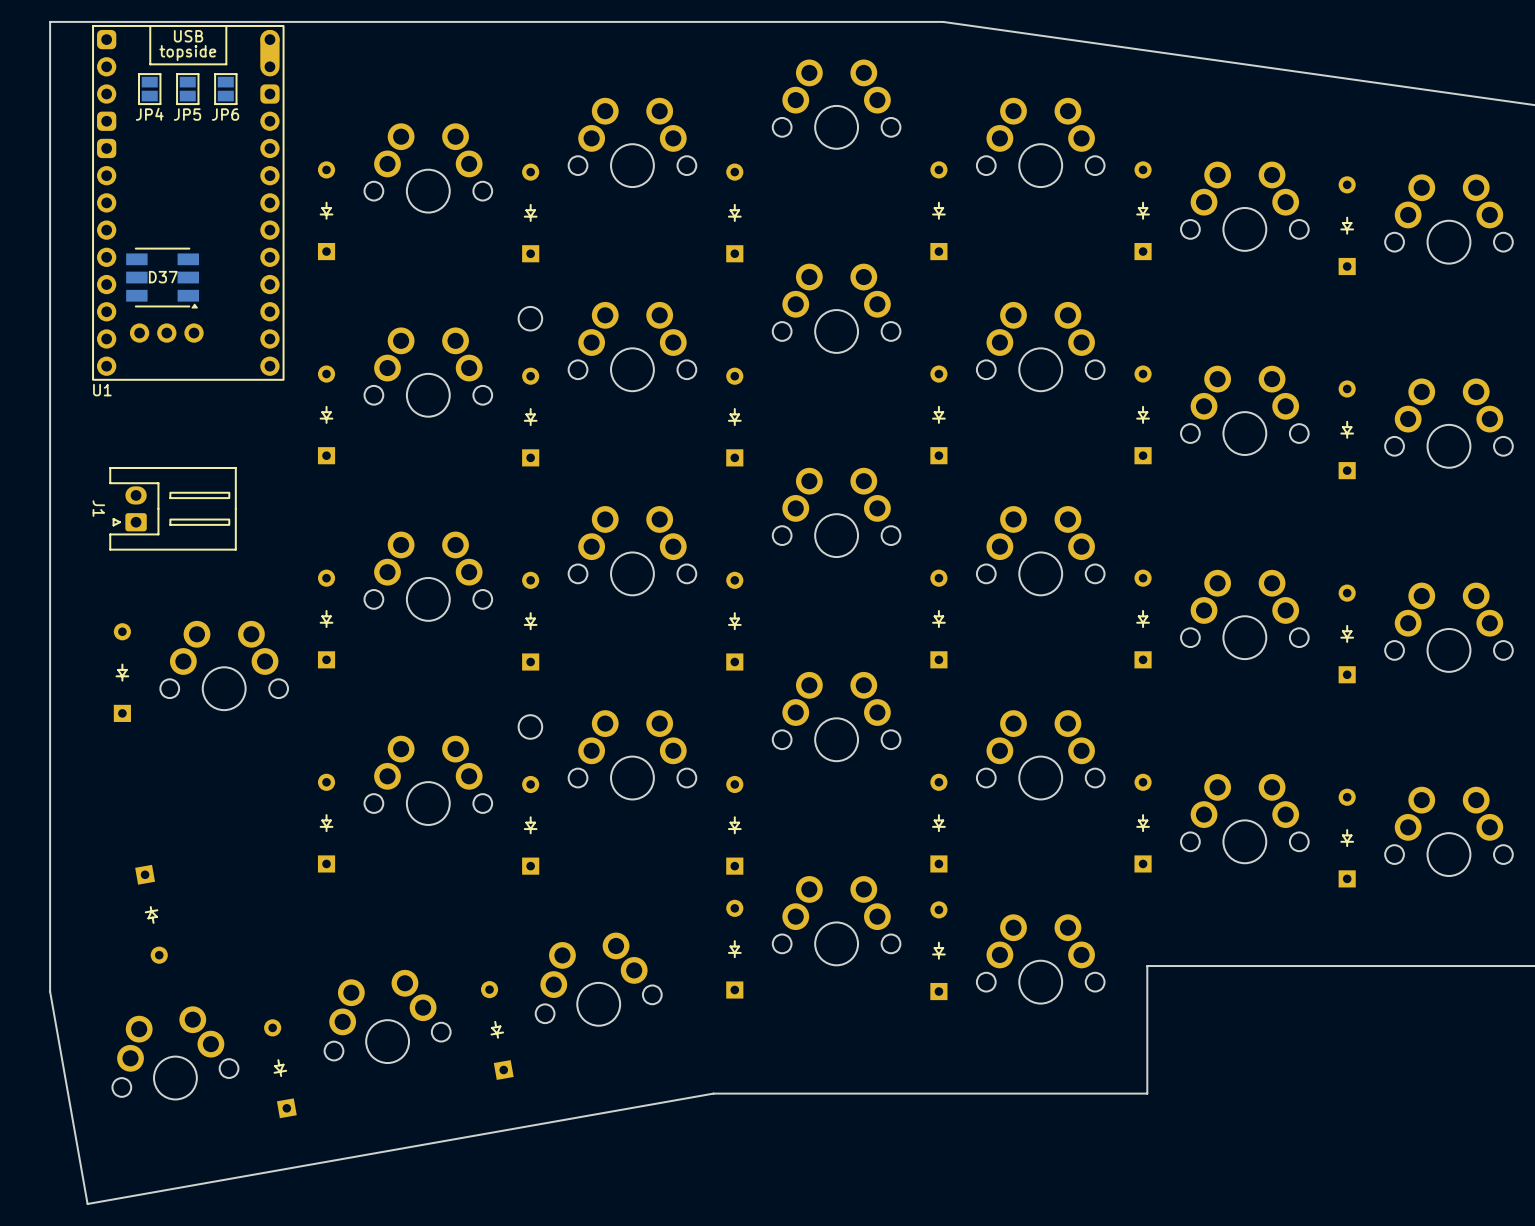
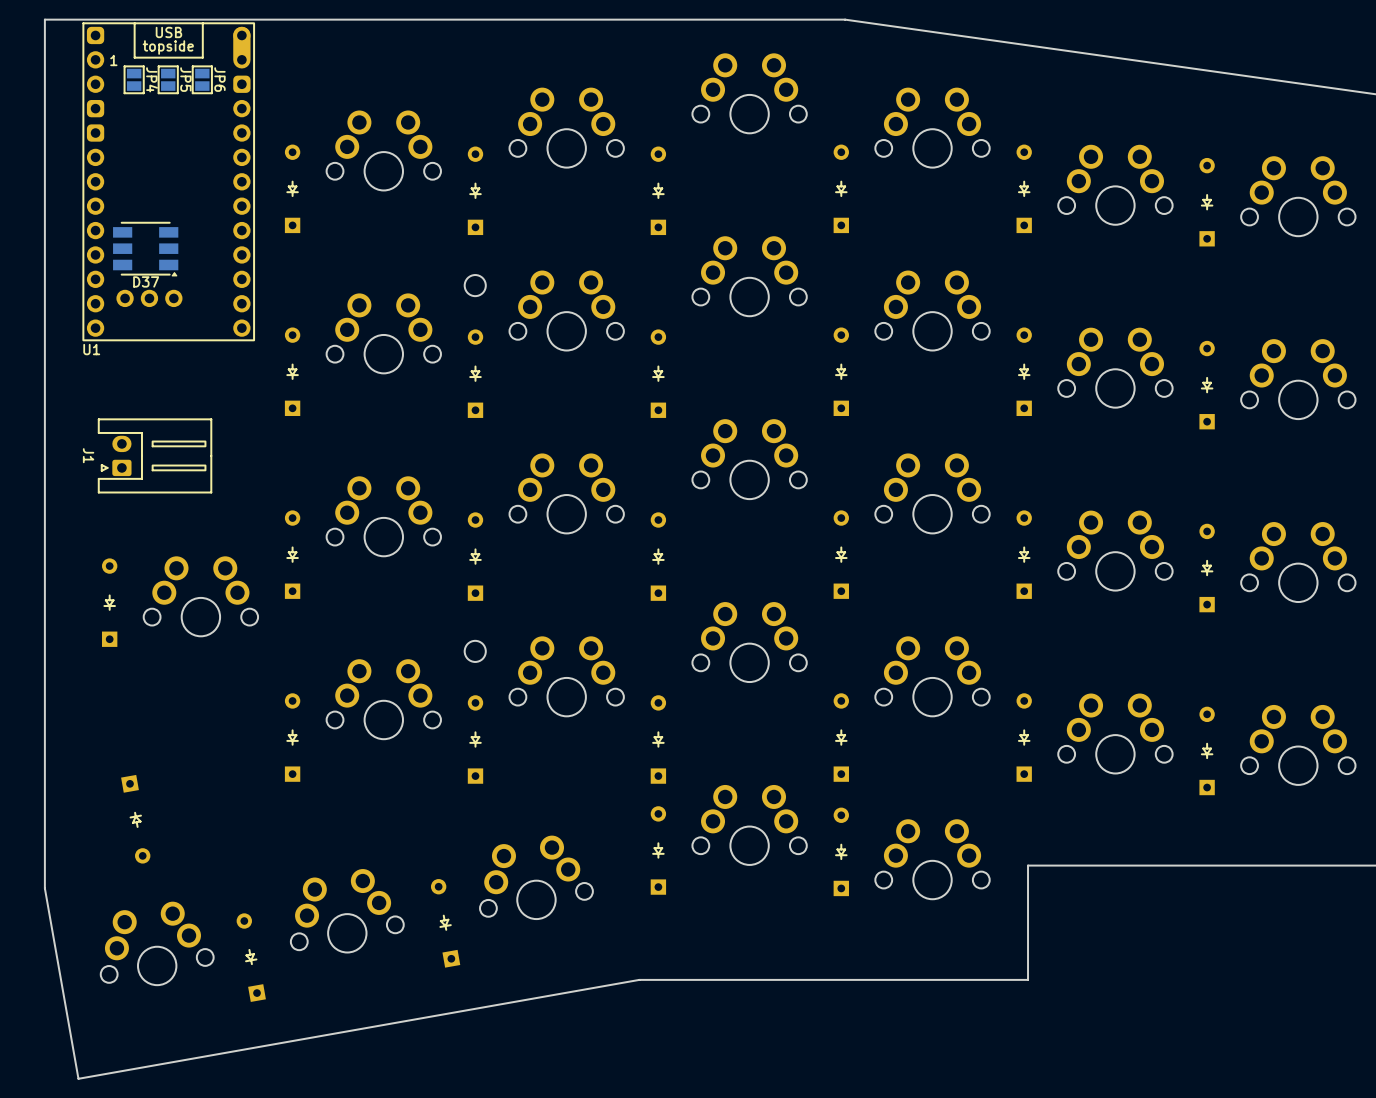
U1 text: none -> 1 (113, 60)
JP4 name rotation: 0° (149, 114) -> 90° clockwise (152, 79)
JP5 name rotation: 0° (187, 114) -> 90° clockwise (185, 79)
JP6 name rotation: 0° (225, 114) -> 90° clockwise (219, 79)
D37 name position: D37 (163, 277) -> D37 (146, 281)

